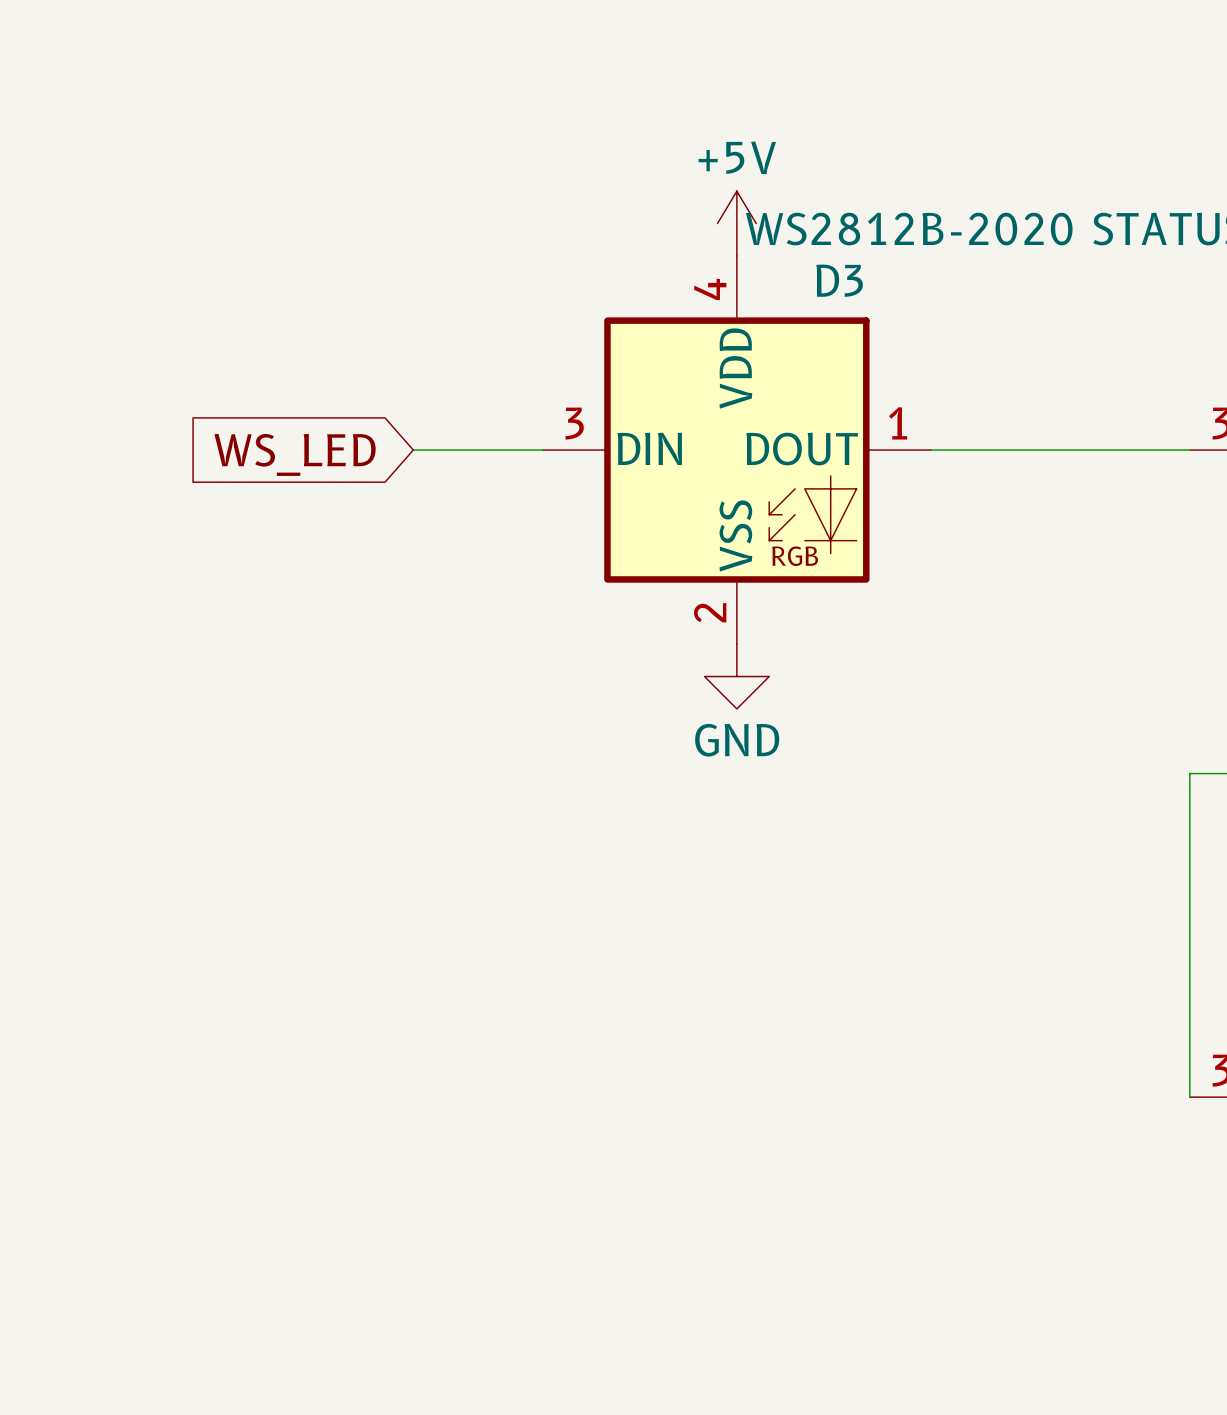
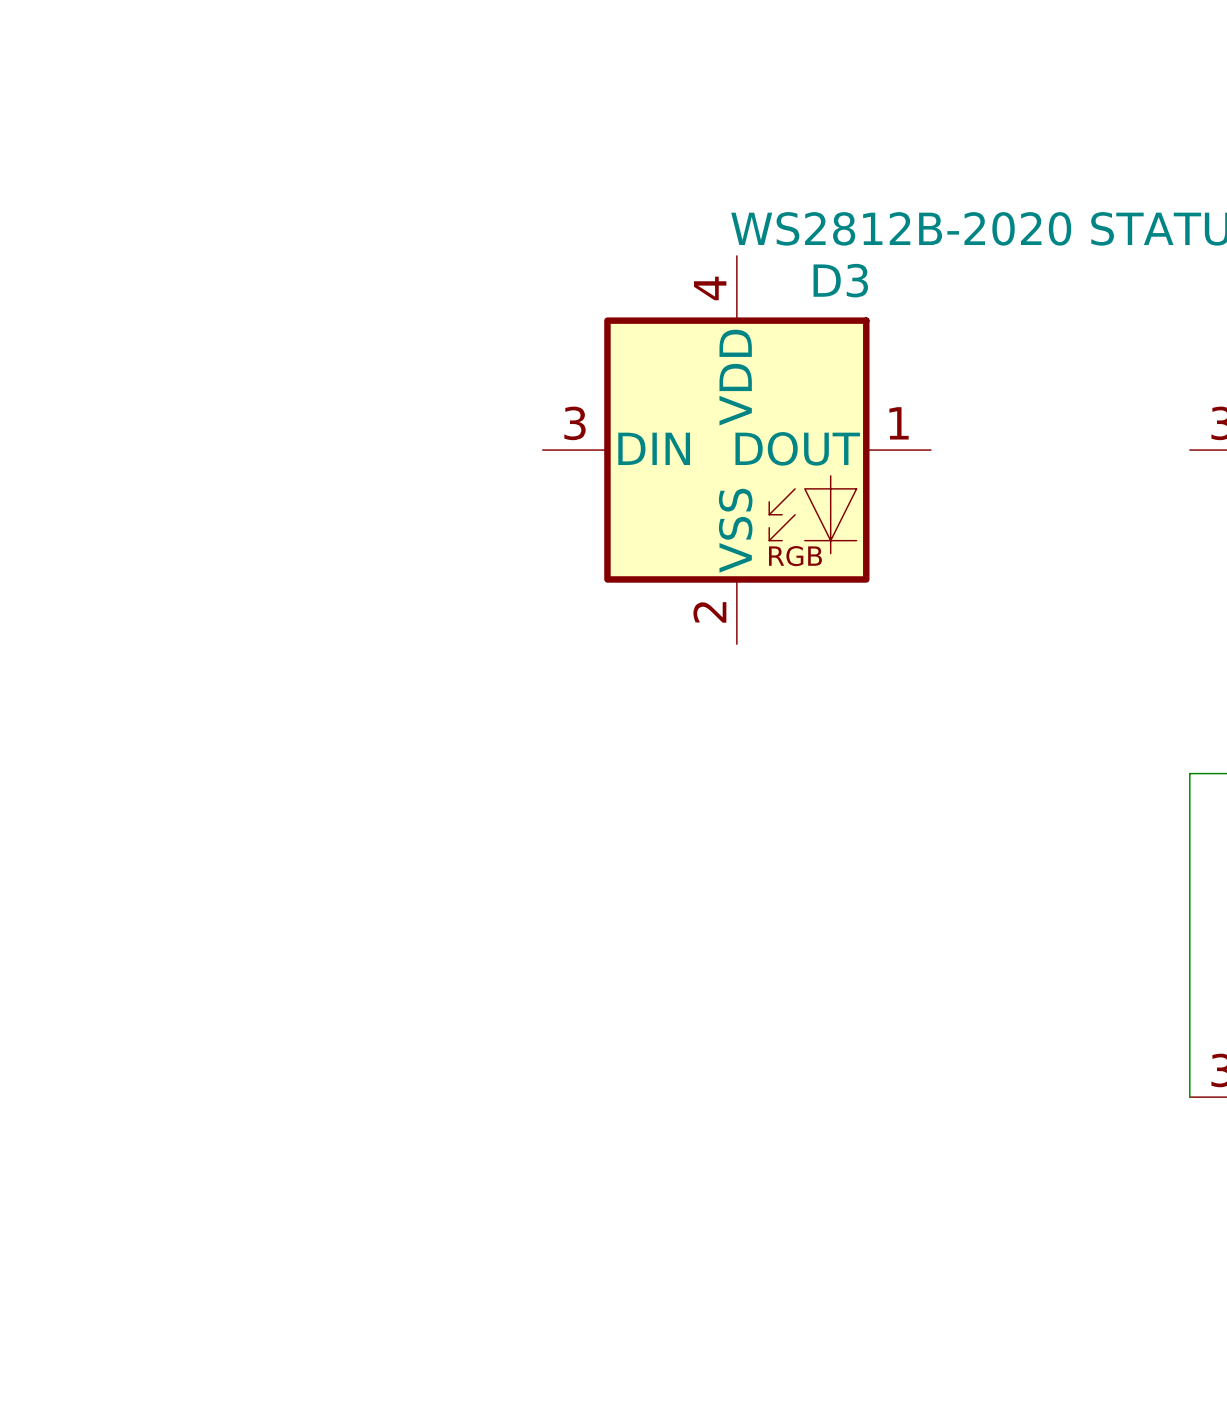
power symbol: +5V (736, 223) -> none
wire: (413, 450) (542, 450) -> none
wire: (930, 450) (1189, 450) -> none
global label: WS_LED (295, 454) -> none
power symbol: GND (736, 676) -> none

